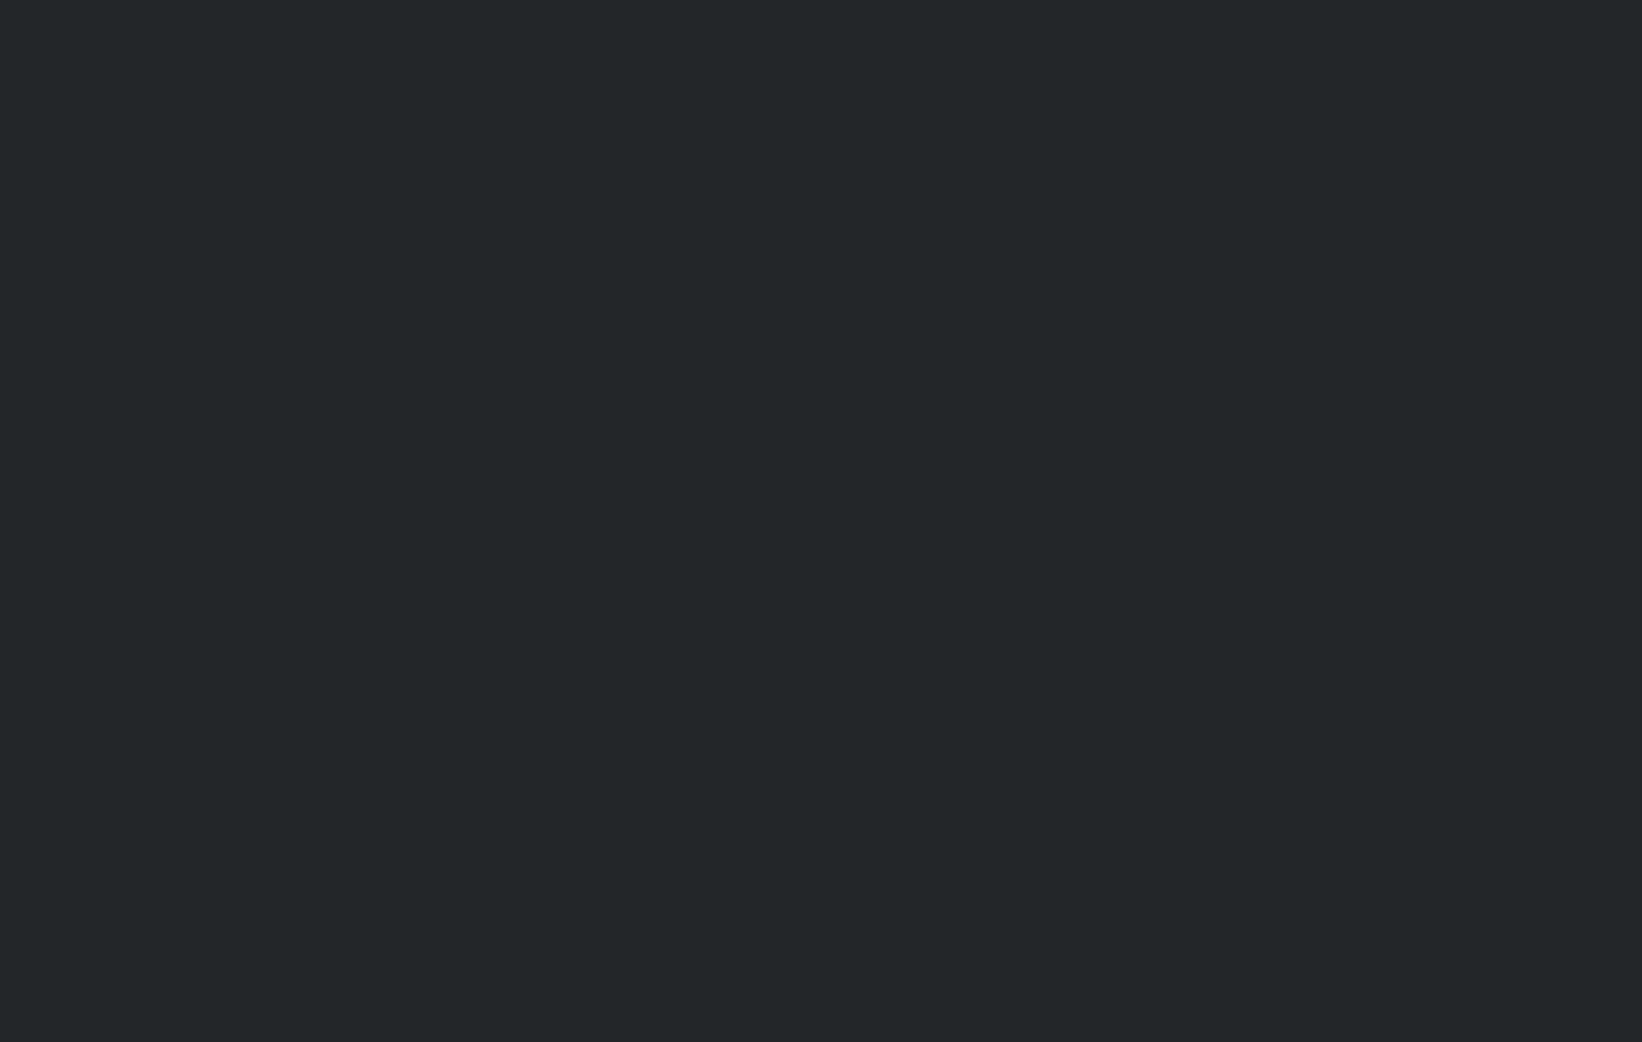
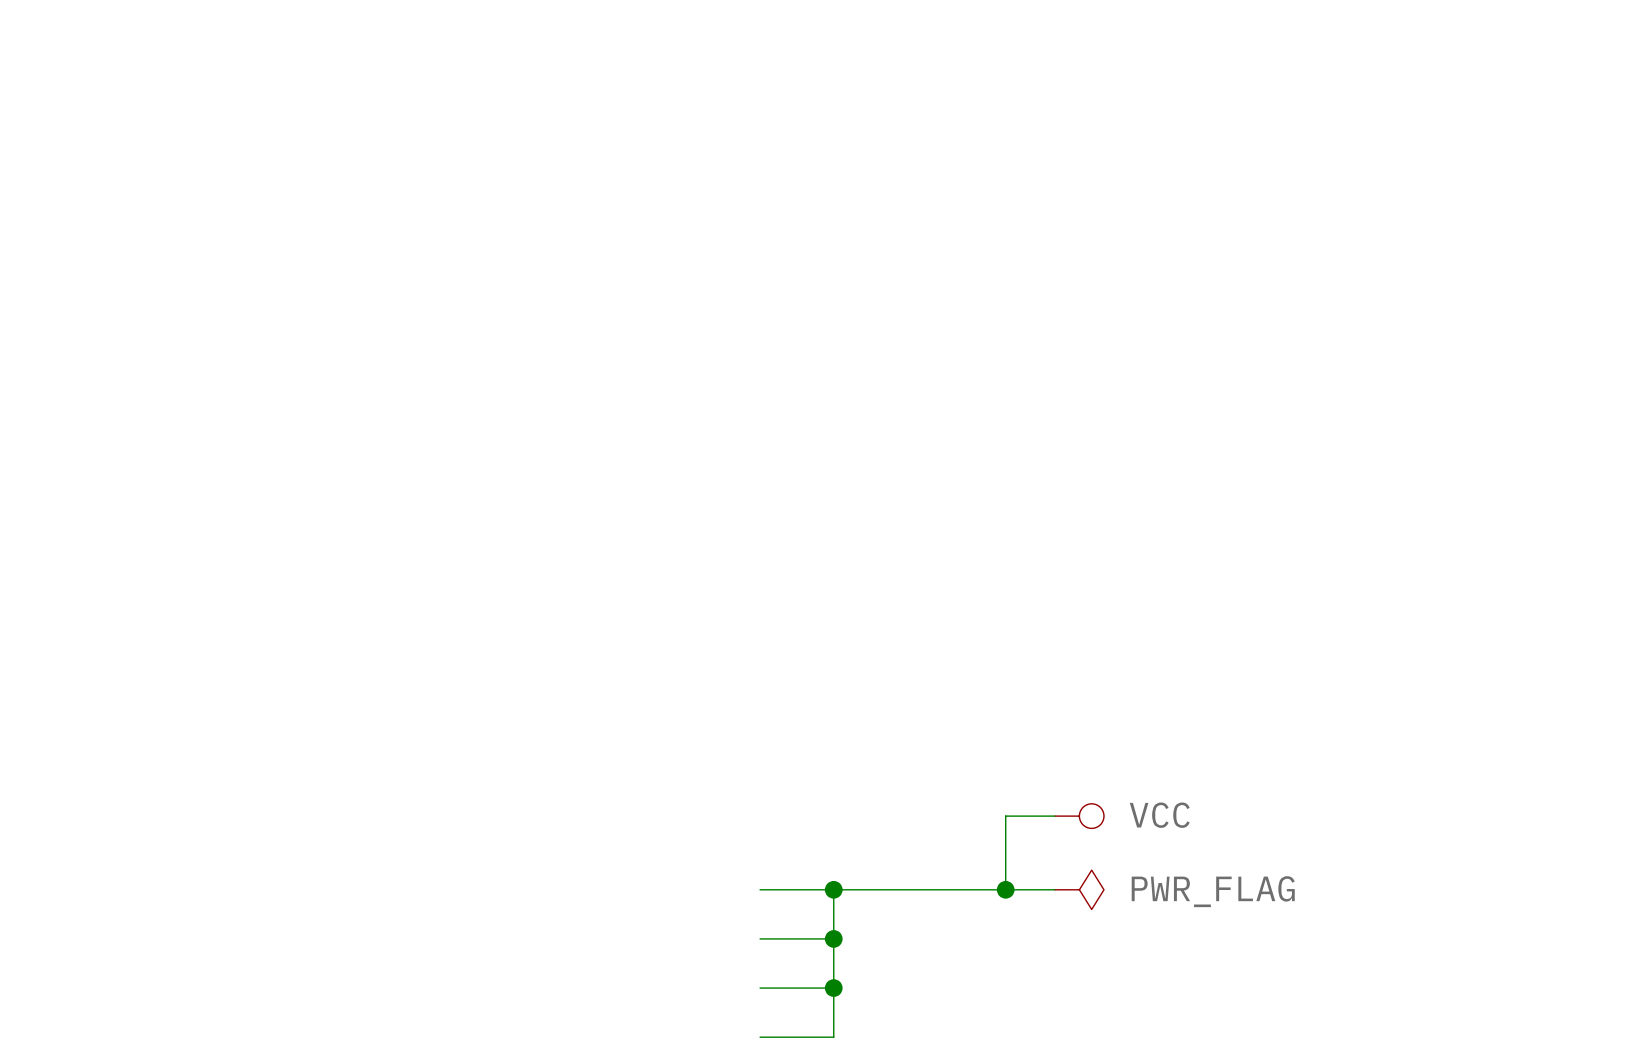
wire: none -> (1054, 816) (1005, 816) (1005, 889)
power symbol: none -> VCC (1079, 816)
wire: none -> (760, 889) (1054, 889)
wire: none -> (833, 889) (833, 1037) (760, 1037)
junction: none -> (833, 889)
junction: none -> (1005, 889)
power symbol: none -> PWR_FLAG (1079, 889)
wire: none -> (760, 938) (833, 938)
junction: none -> (833, 938)
wire: none -> (760, 988) (833, 988)
junction: none -> (833, 988)

